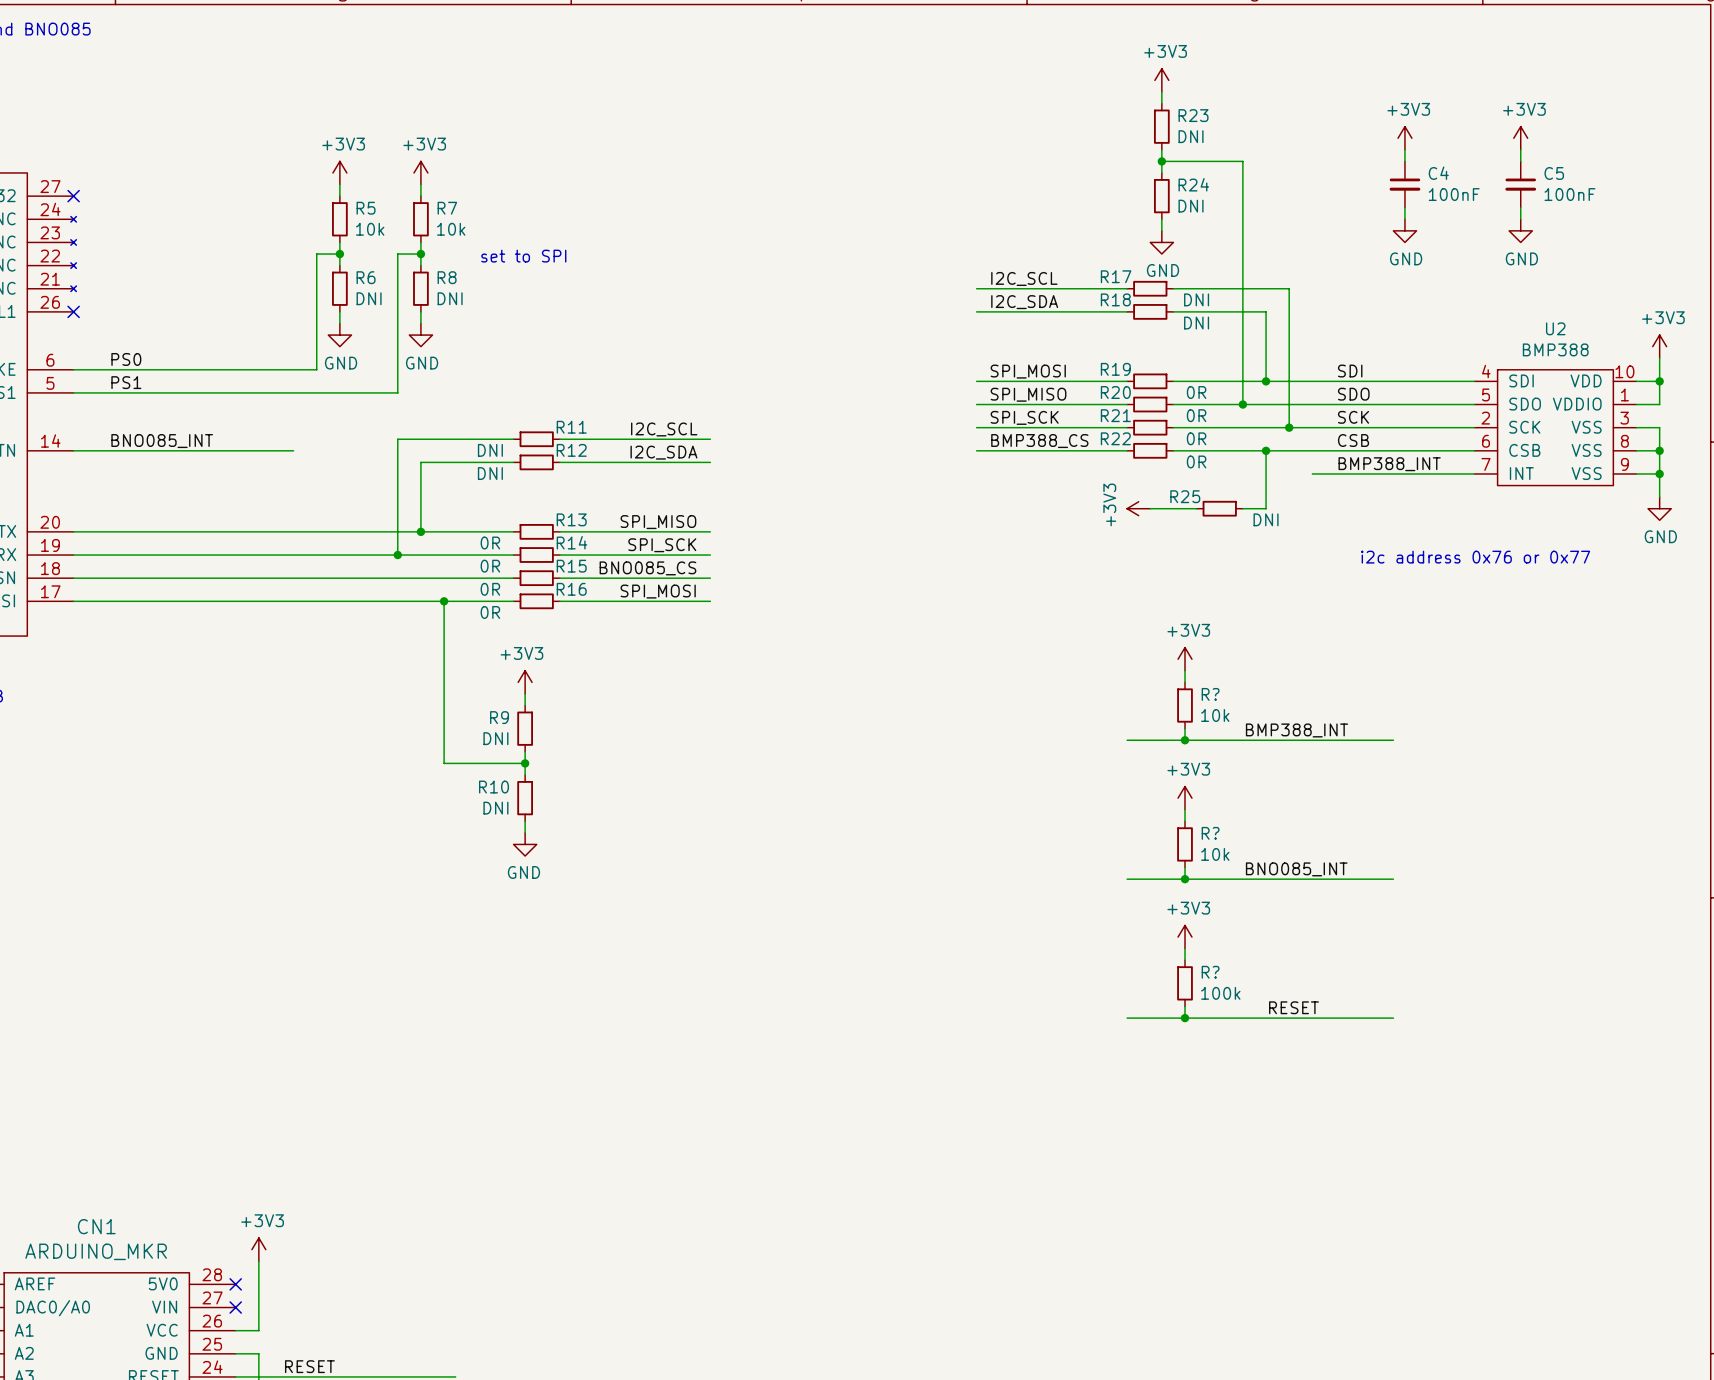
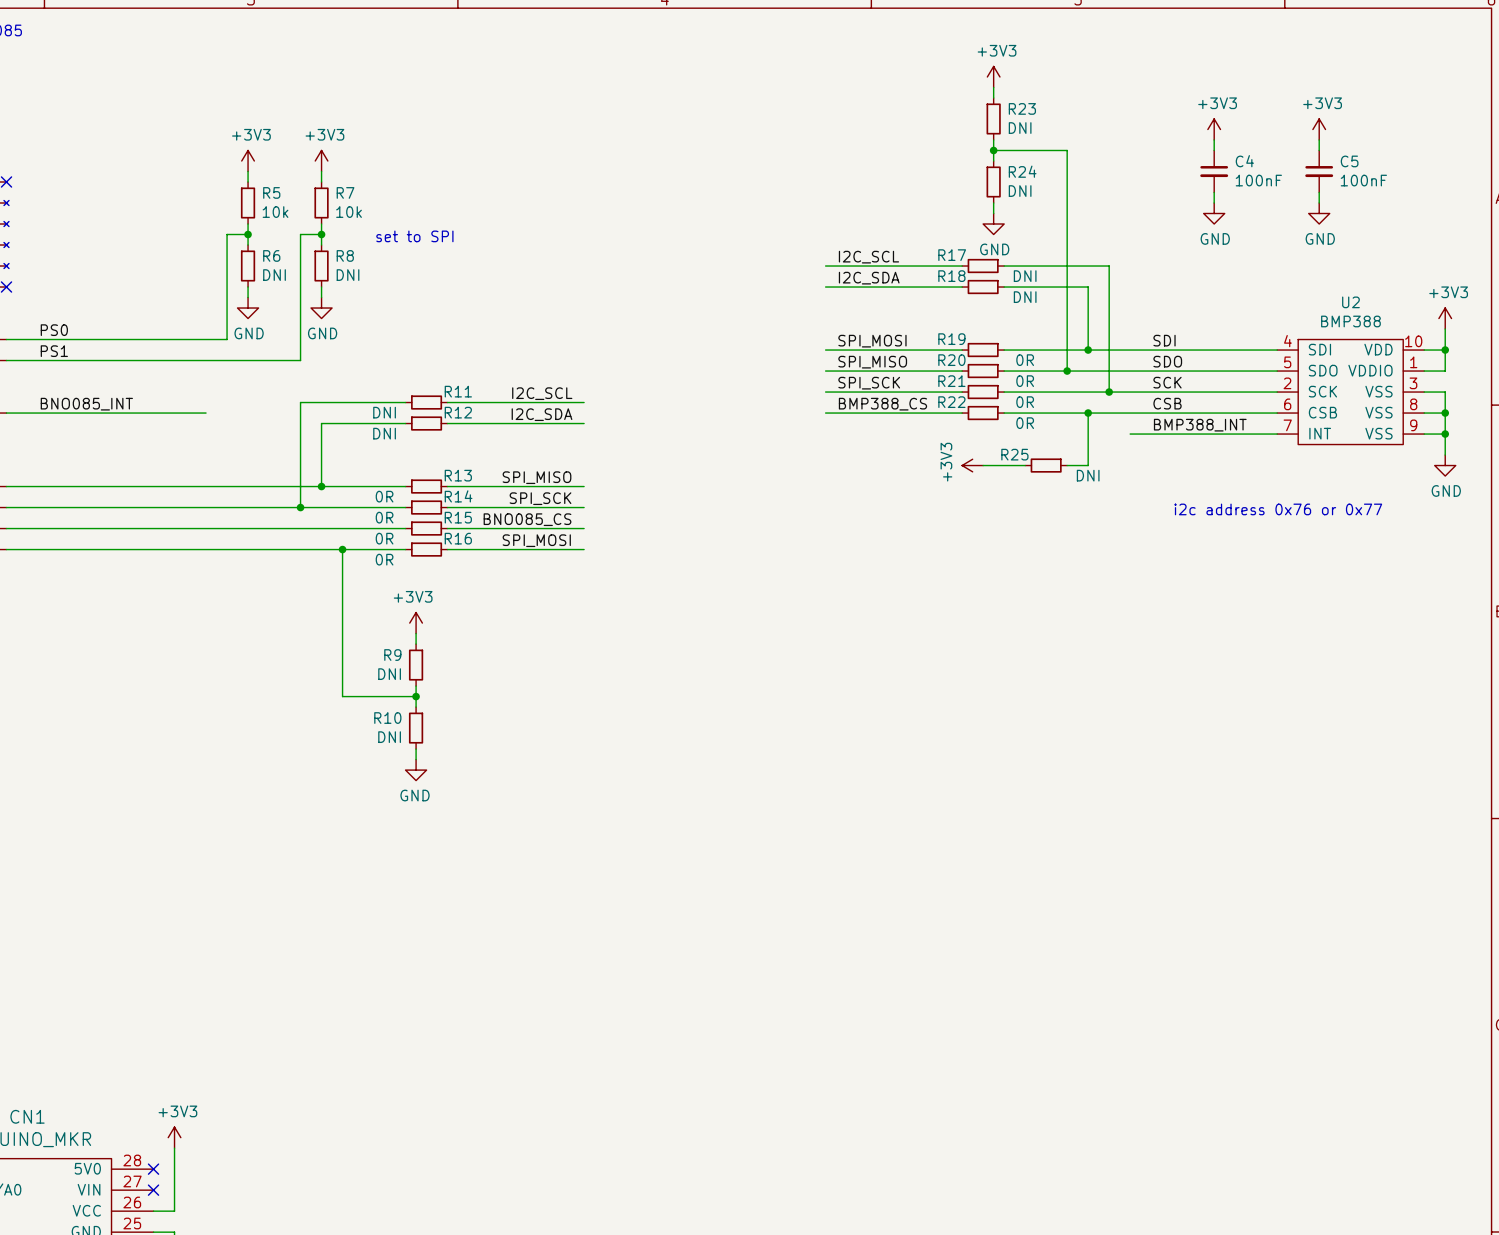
power symbol: +3V3 (1185, 659) -> none
wire: (1185, 670) (1185, 682) -> none
R?: 10k (1185, 705) -> none
wire: (1185, 728) (1185, 740) -> none
label: BMP388_INT (1297, 730) -> none
wire: (1127, 740) (1393, 740) -> none
junction: (1185, 740) -> none
power symbol: +3V3 (1185, 798) -> none
wire: (1185, 809) (1185, 821) -> none
R?: 10k (1185, 844) -> none
wire: (1185, 867) (1185, 879) -> none
label: BNO085_INT (1296, 869) -> none
wire: (1127, 879) (1393, 879) -> none
junction: (1185, 879) -> none
power symbol: +3V3 (1185, 937) -> none
wire: (1185, 948) (1185, 960) -> none
R?: 100k (1185, 983) -> none
wire: (1185, 1006) (1185, 1018) -> none
label: RESET (1293, 1007) -> none
wire: (1127, 1018) (1393, 1018) -> none
junction: (1185, 1018) -> none

